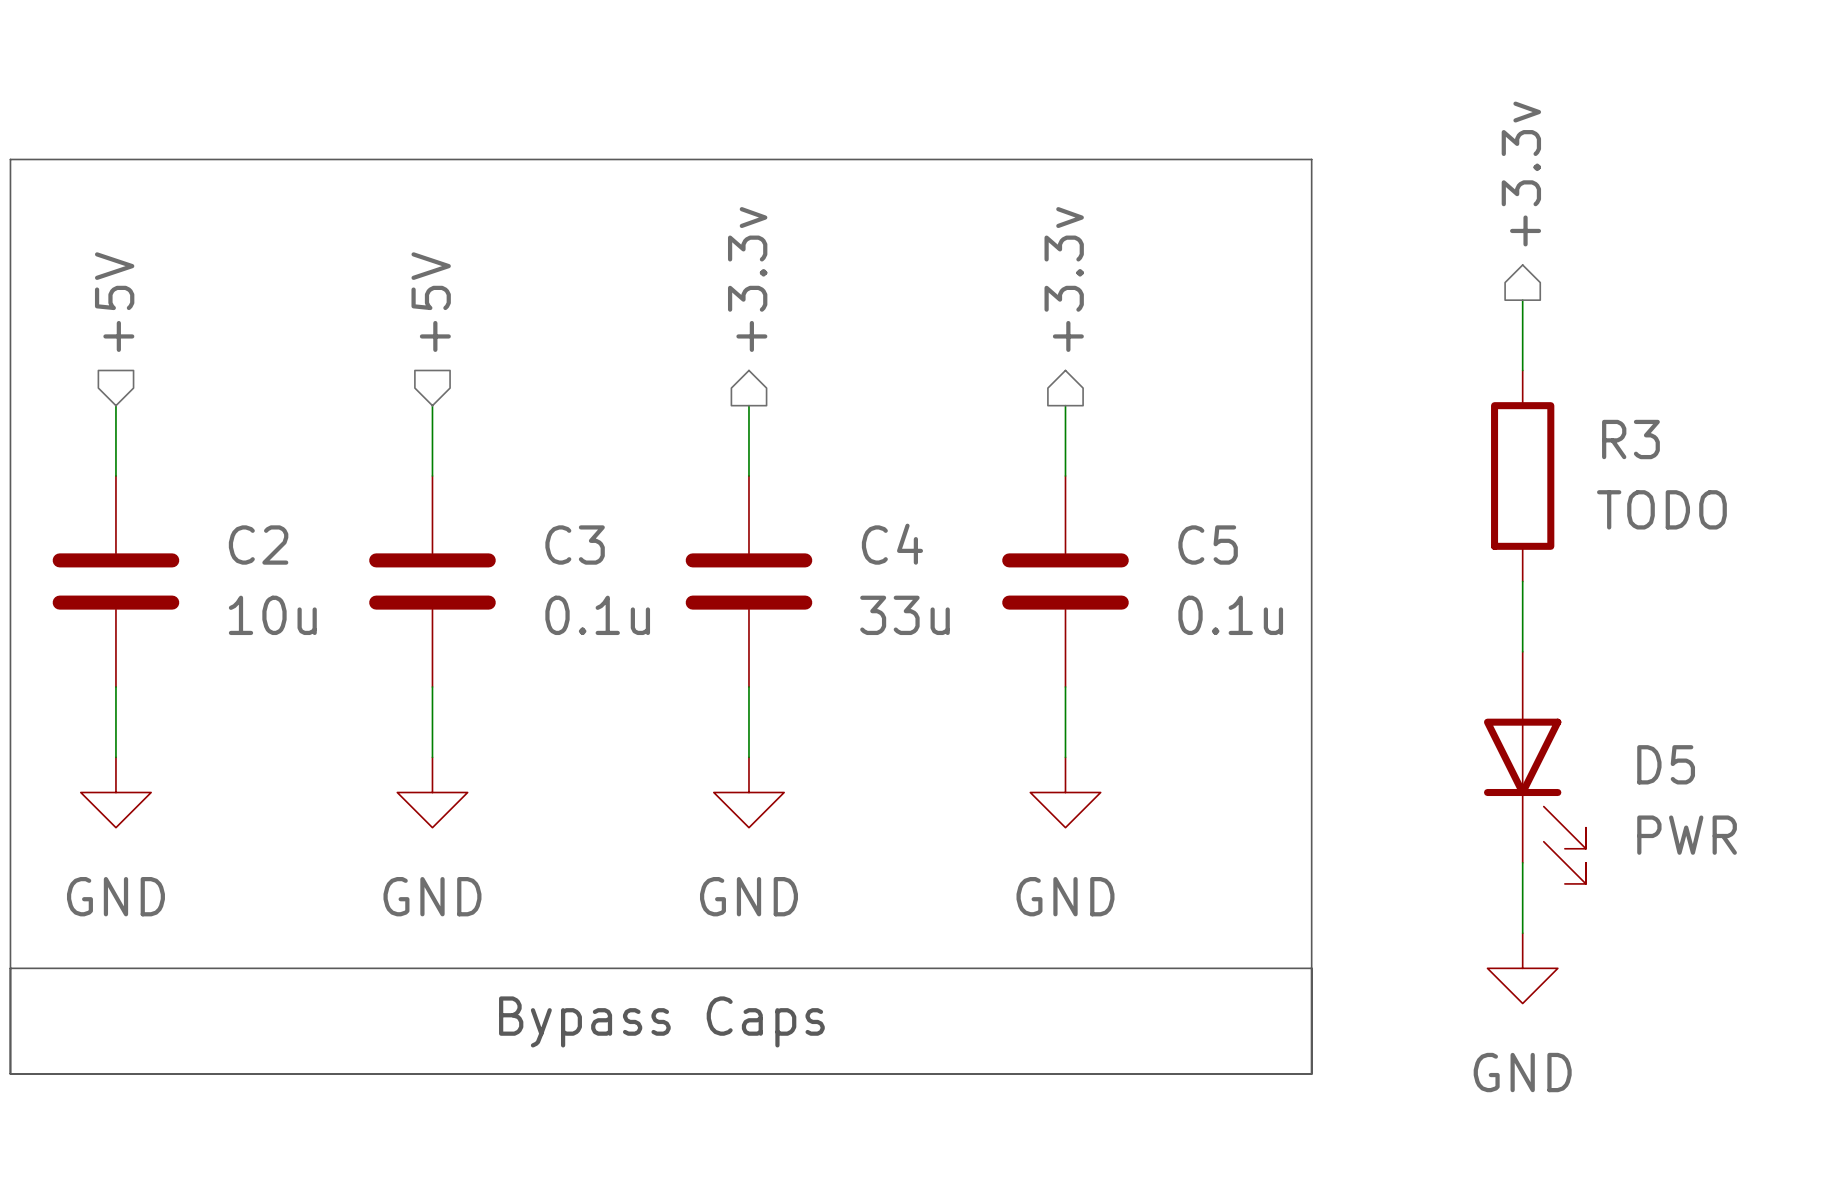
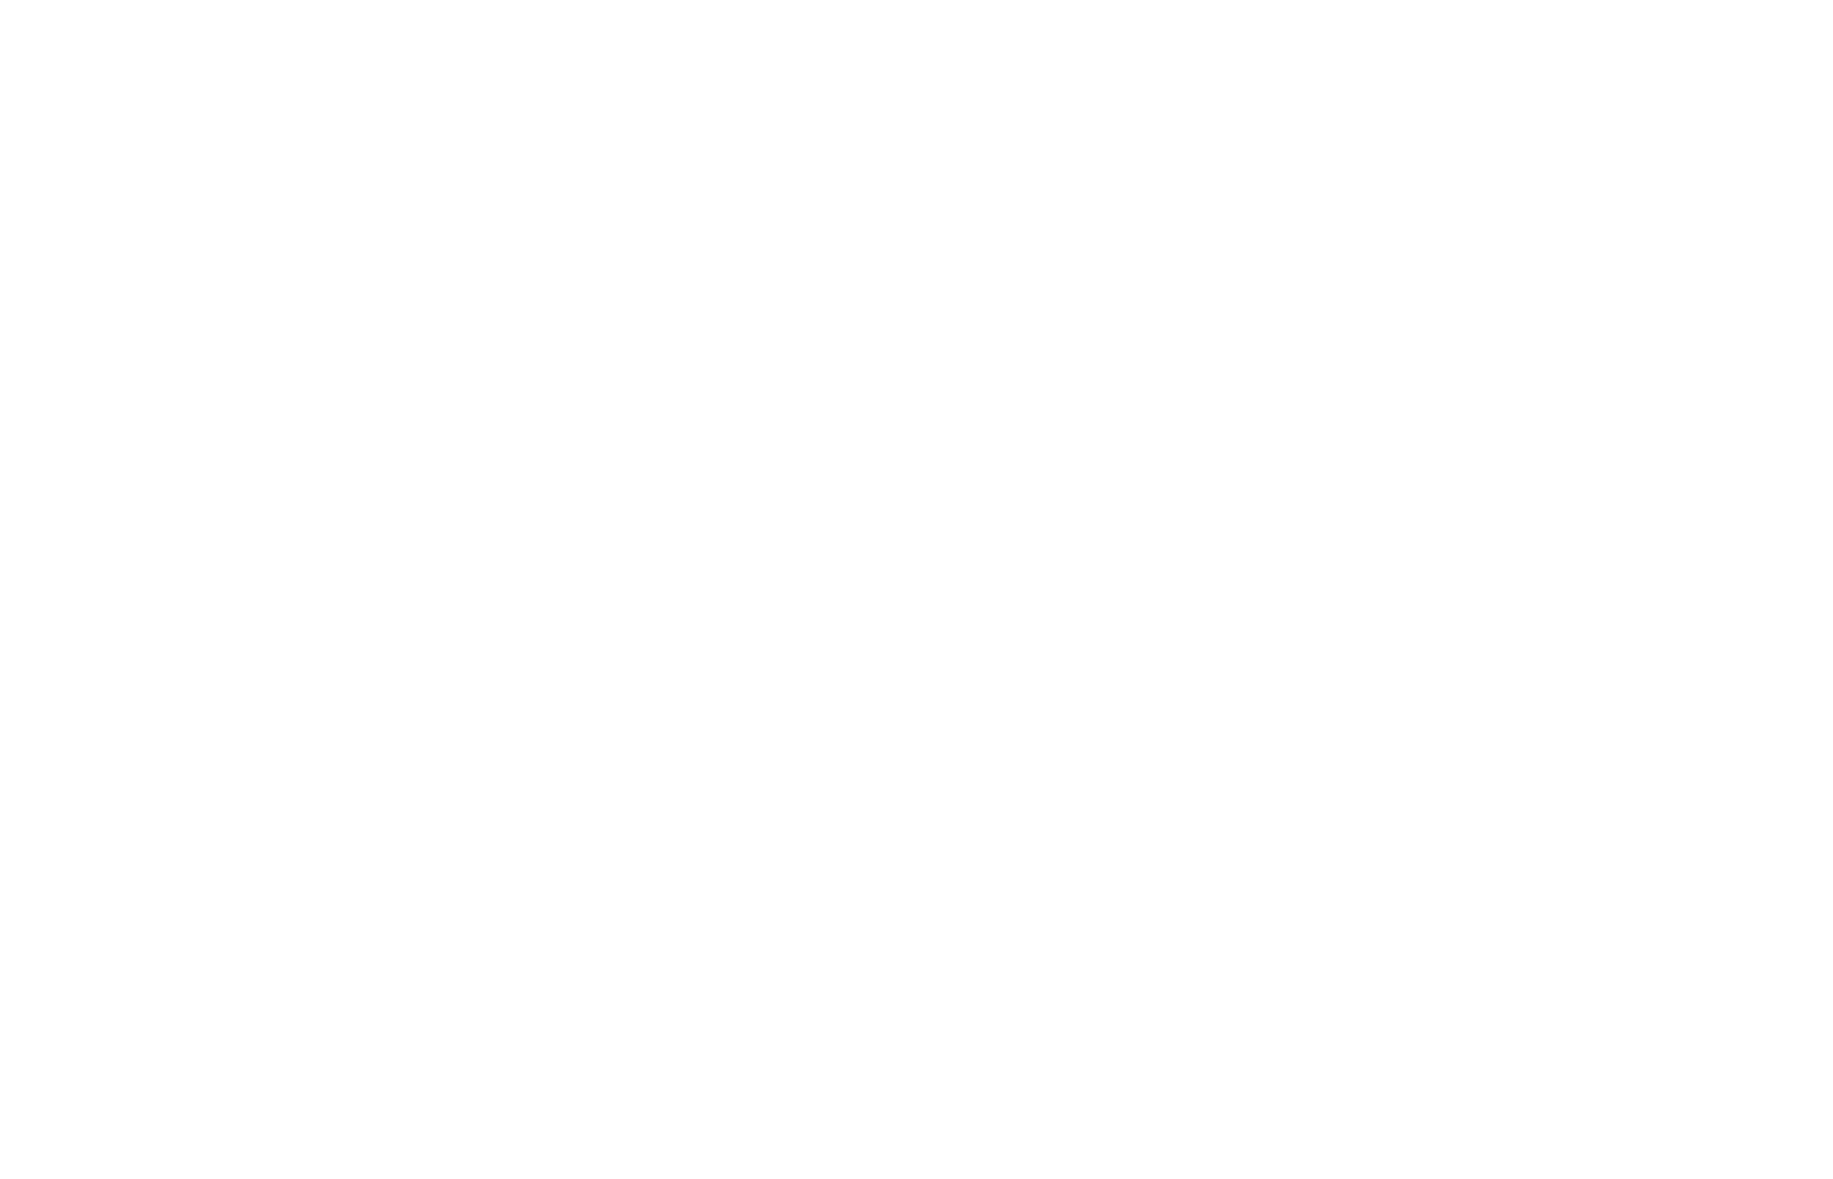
line: (10, 159) (1311, 159) (1311, 1073) (10, 1073) (10, 159) -> none
hierarchical label: +3.3v (1521, 174) -> none
hierarchical label: +3.3v (747, 279) -> none
hierarchical label: +3.3v (1064, 279) -> none
wire: (1522, 300) (1522, 370) -> none
hierarchical label: +5V (114, 302) -> none
hierarchical label: +5V (431, 302) -> none
wire: (115, 405) (115, 475) -> none
wire: (432, 405) (432, 475) -> none
wire: (748, 405) (748, 475) -> none
wire: (1065, 405) (1065, 475) -> none
R3: TODO (1522, 475) -> none
C2: 10u (115, 581) -> none
C3: 0.1u (432, 581) -> none
C4: 33u (748, 581) -> none
C5: 0.1u (1065, 581) -> none
wire: (1522, 581) (1522, 651) -> none
wire: (115, 687) (115, 757) -> none
wire: (432, 687) (432, 757) -> none
wire: (748, 687) (748, 757) -> none
wire: (1065, 687) (1065, 757) -> none
D5: PWR (1534, 767) -> none
power symbol: GND (115, 792) -> none
power symbol: GND (432, 792) -> none
power symbol: GND (748, 792) -> none
power symbol: GND (1065, 792) -> none
wire: (1522, 862) (1522, 933) -> none
line: (10, 968) (1311, 968) -> none
power symbol: GND (1522, 968) -> none
text: Bypass Caps (661, 1021) -> none

